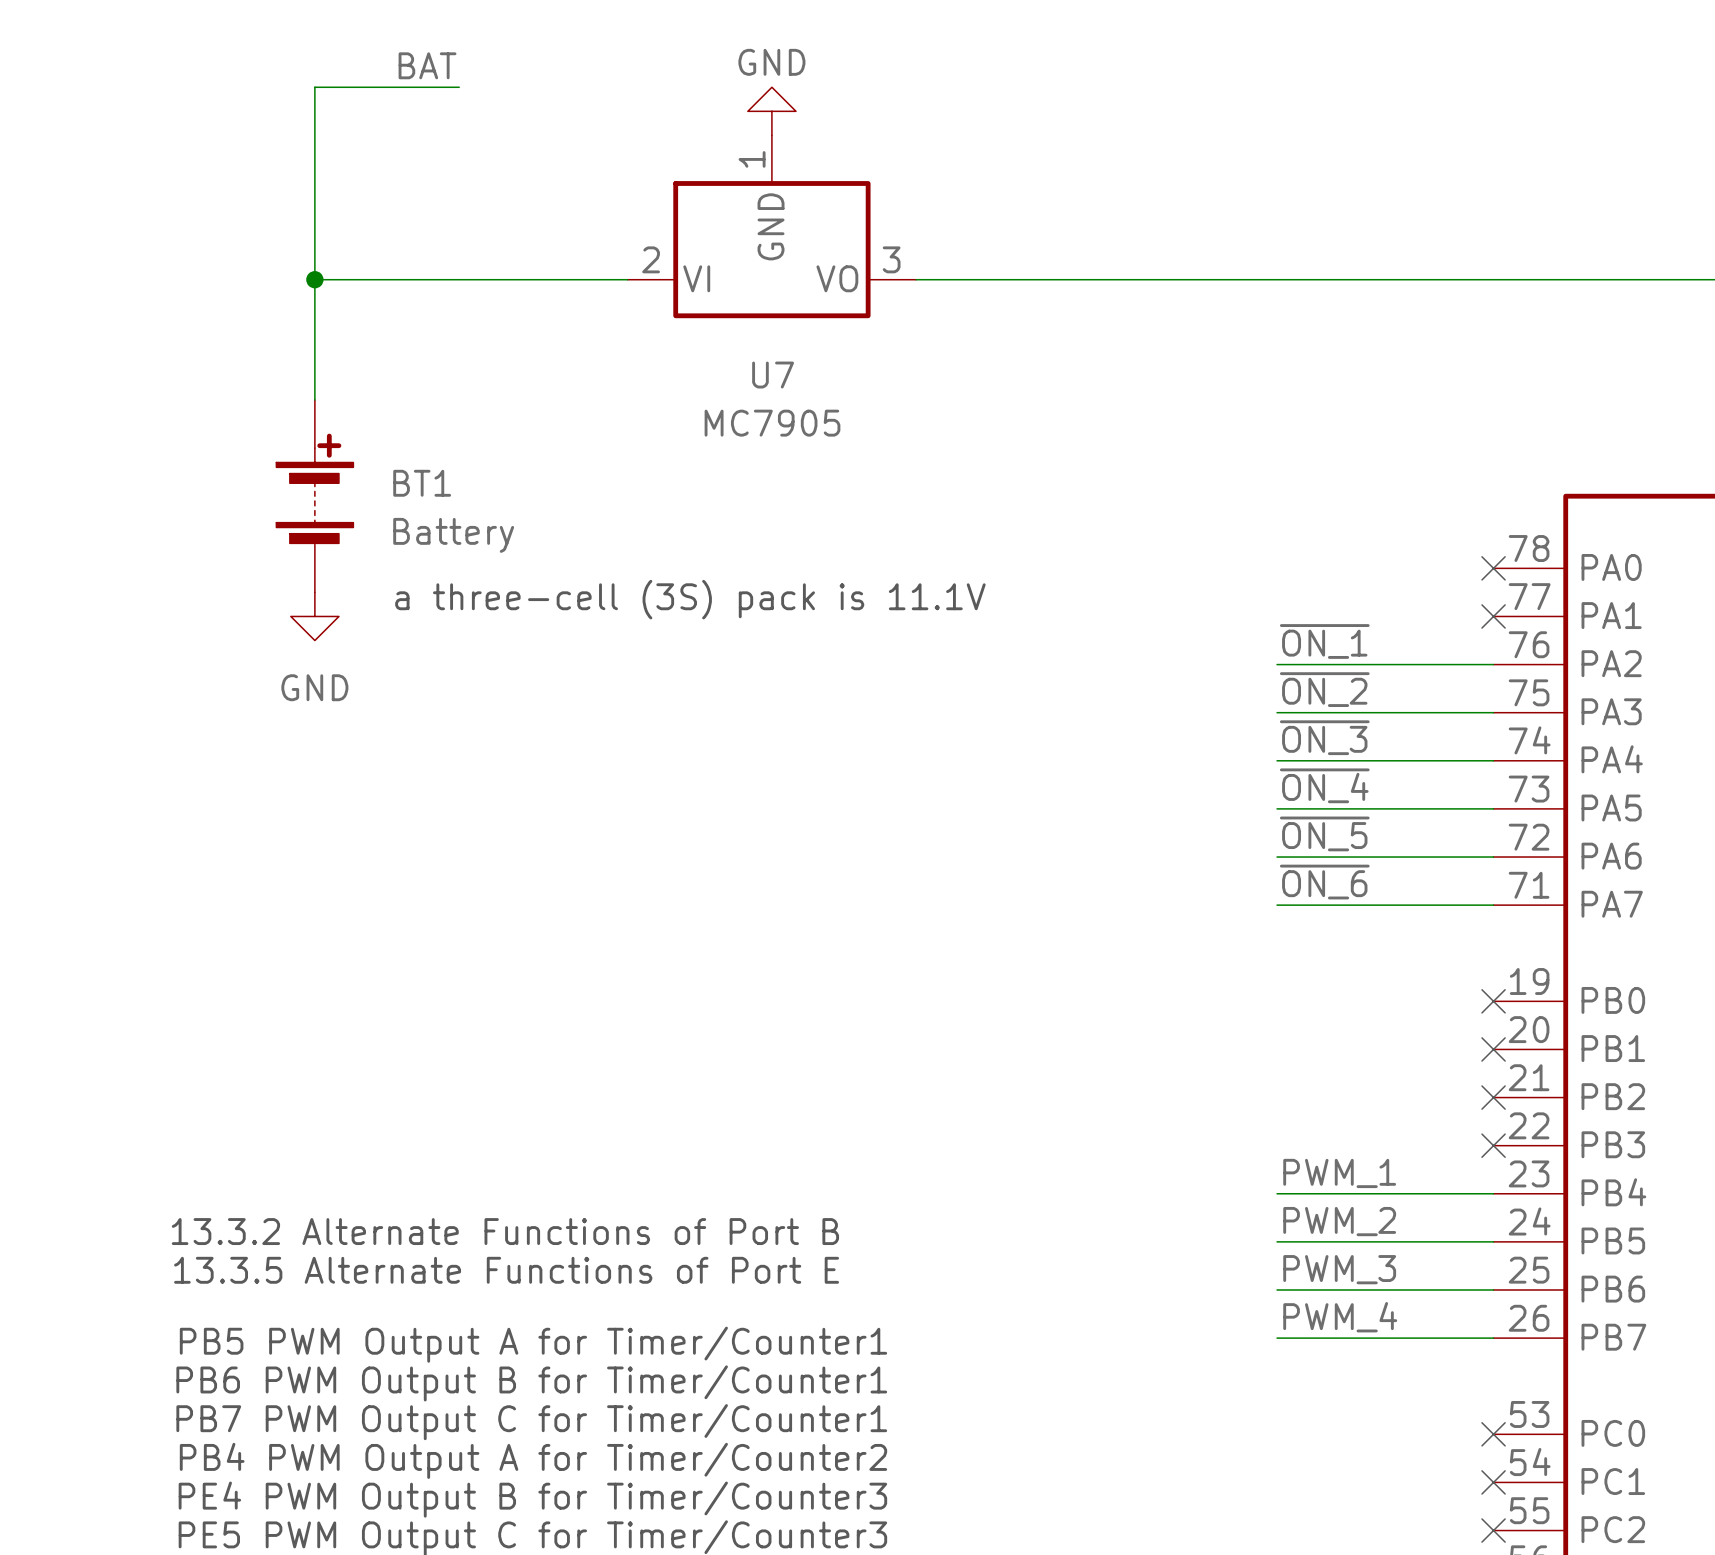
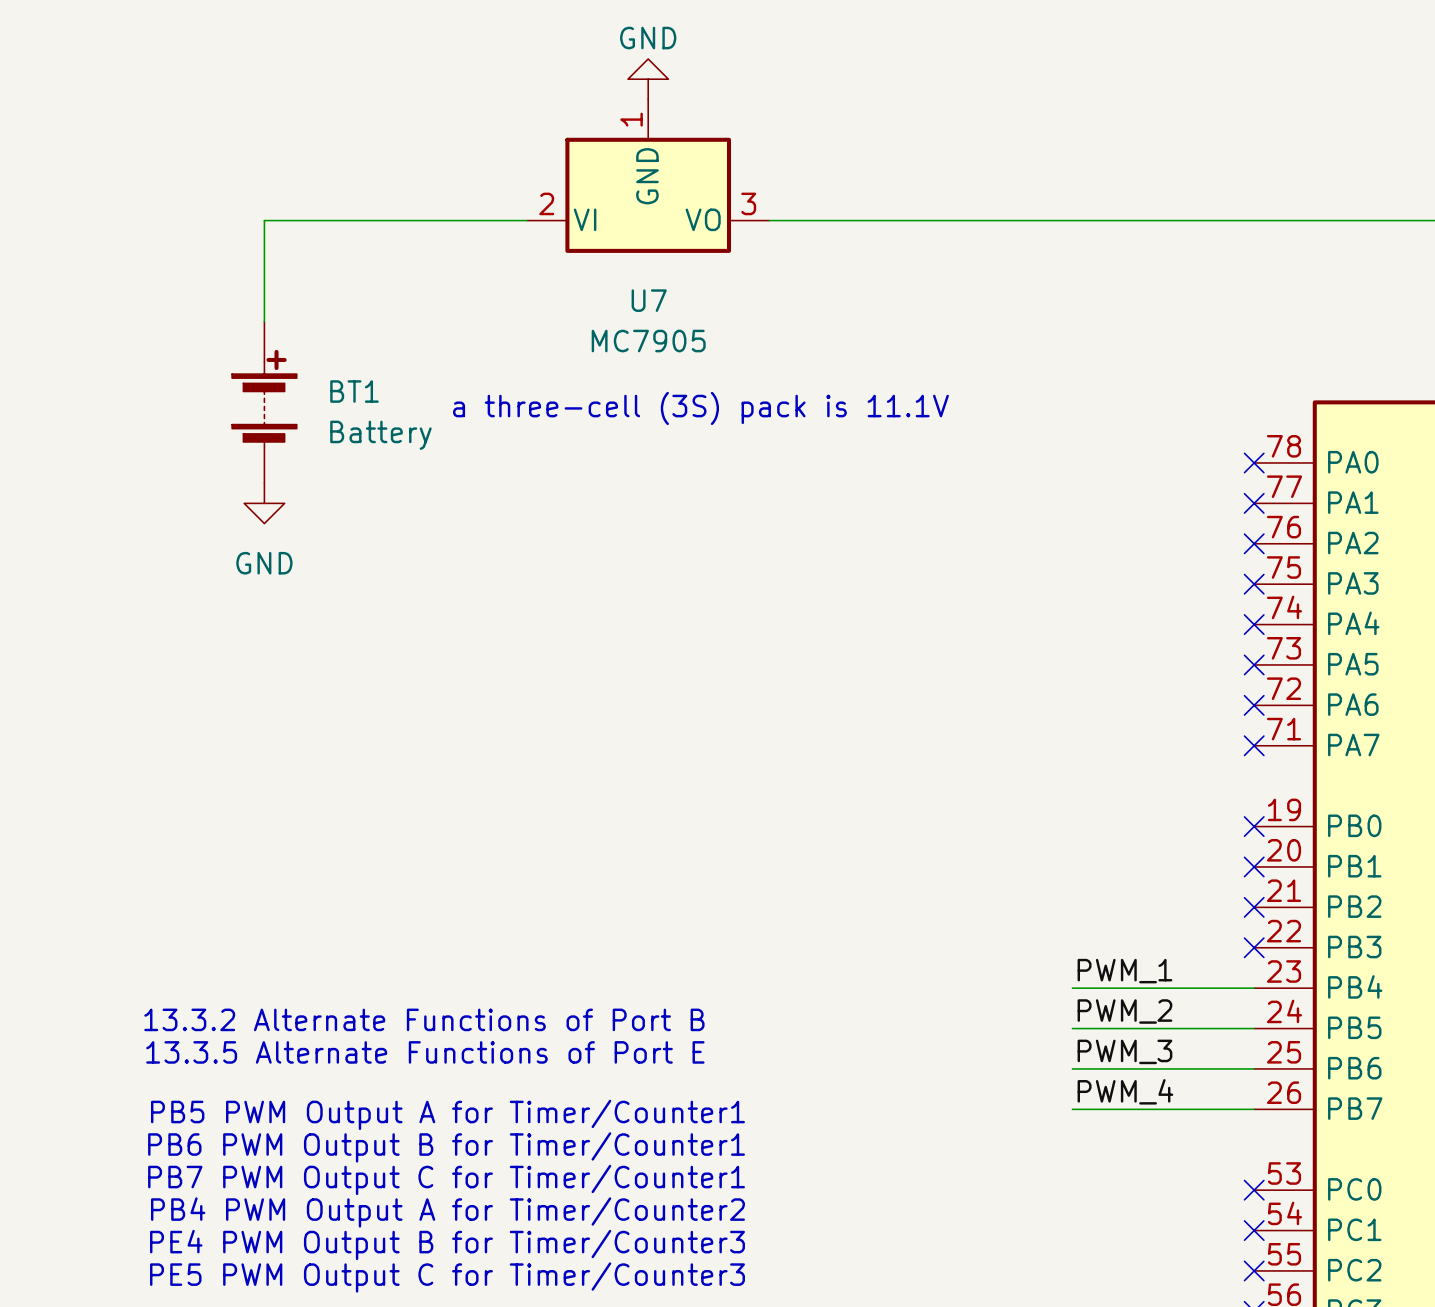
label: BAT (427, 65) -> none
wire: (459, 87) (314, 87) (314, 279) -> none
junction: (314, 279) -> none
text position: a three-cell (3S) pack is 11.1V (690, 599) -> a three-cell (3S) pack is 11.1V (700, 408)
label: ~{ON_1} (1324, 641) -> none
wire: (1277, 664) (1493, 664) -> none
no-connect mark: none -> (1254, 543)
label: ~{ON_2} (1324, 689) -> none
wire: (1277, 712) (1493, 712) -> none
no-connect mark: none -> (1254, 584)
label: ~{ON_3} (1324, 737) -> none
wire: (1277, 760) (1493, 760) -> none
no-connect mark: none -> (1254, 624)
label: ~{ON_4} (1324, 785) -> none
wire: (1277, 808) (1493, 808) -> none
no-connect mark: none -> (1254, 664)
label: ~{ON_5} (1324, 833) -> none
wire: (1277, 857) (1493, 857) -> none
no-connect mark: none -> (1254, 705)
label: ~{ON_6} (1324, 882) -> none
wire: (1277, 905) (1493, 905) -> none
no-connect mark: none -> (1254, 745)

